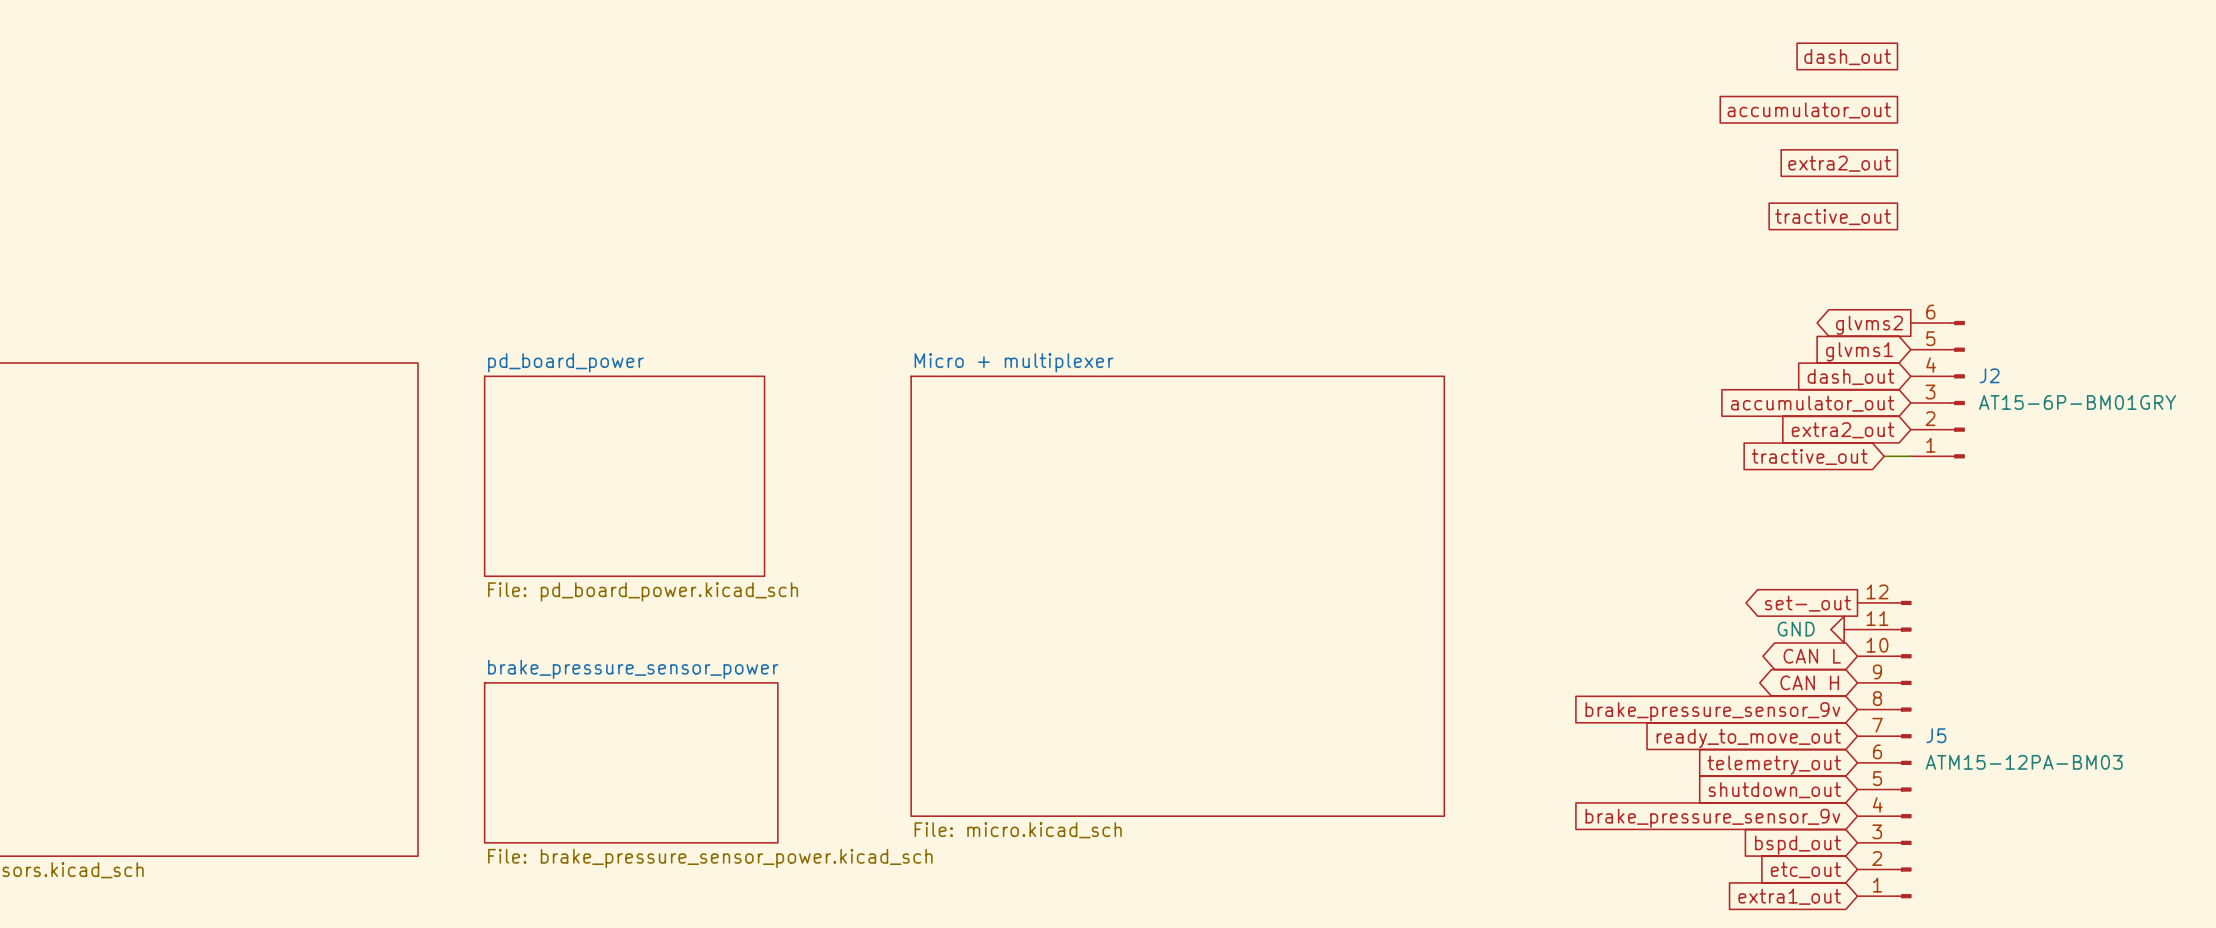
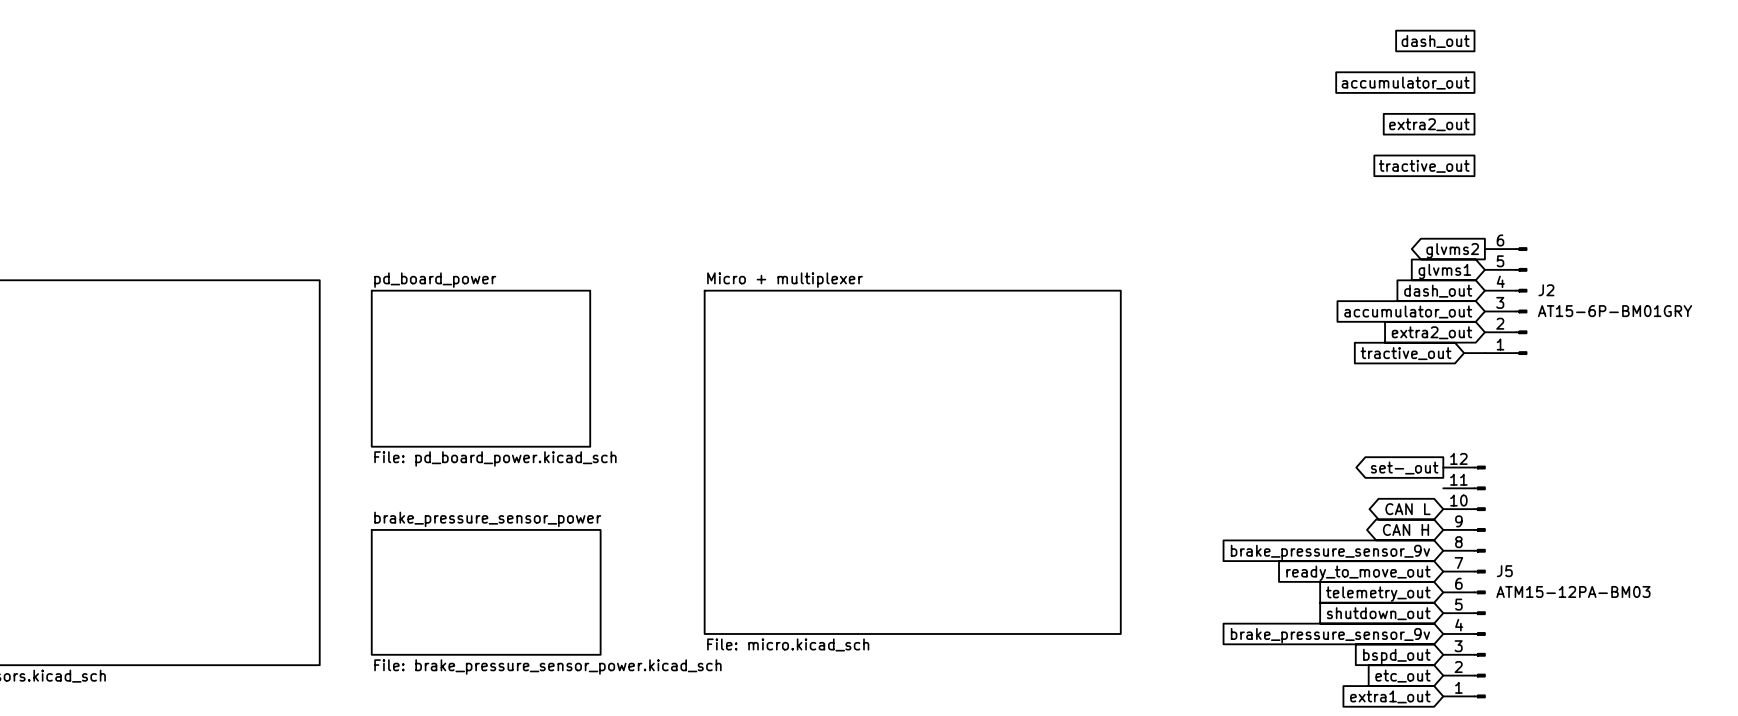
power symbol: GND (1844, 629) -> none

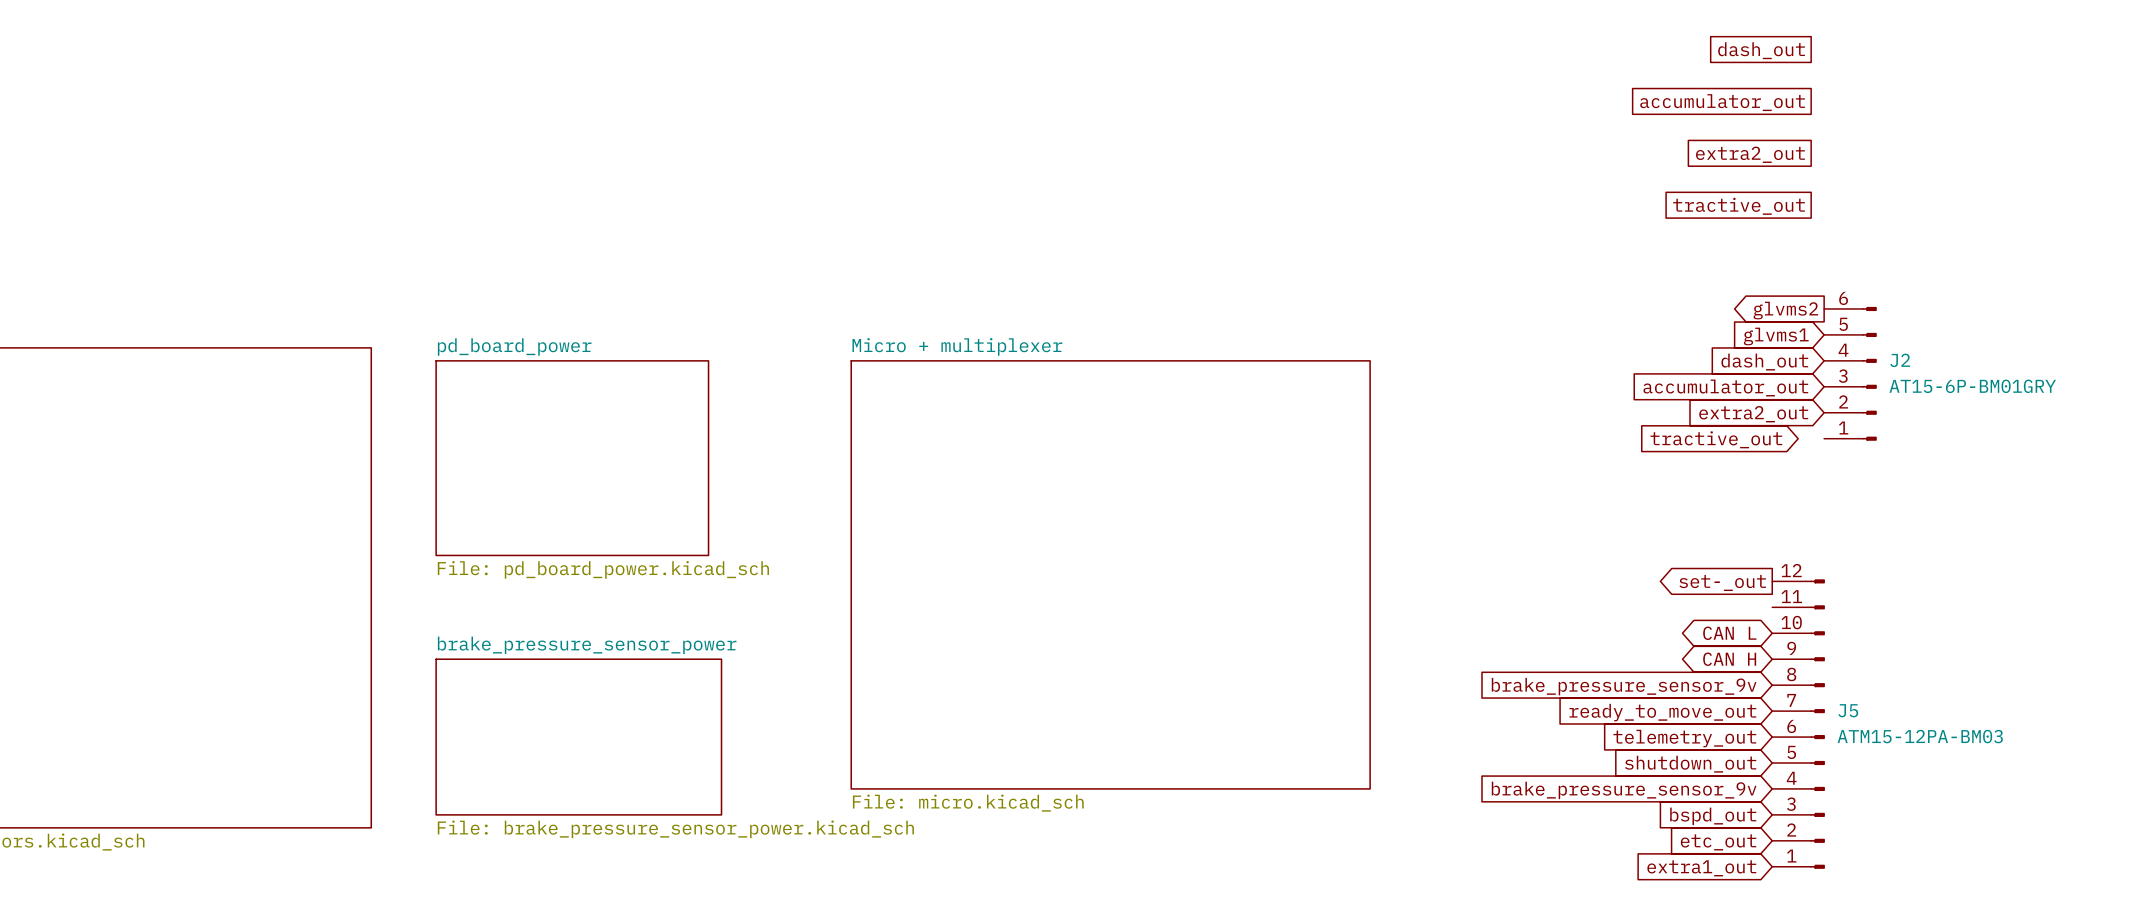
wire: (1464, 353) (1484, 353) -> none

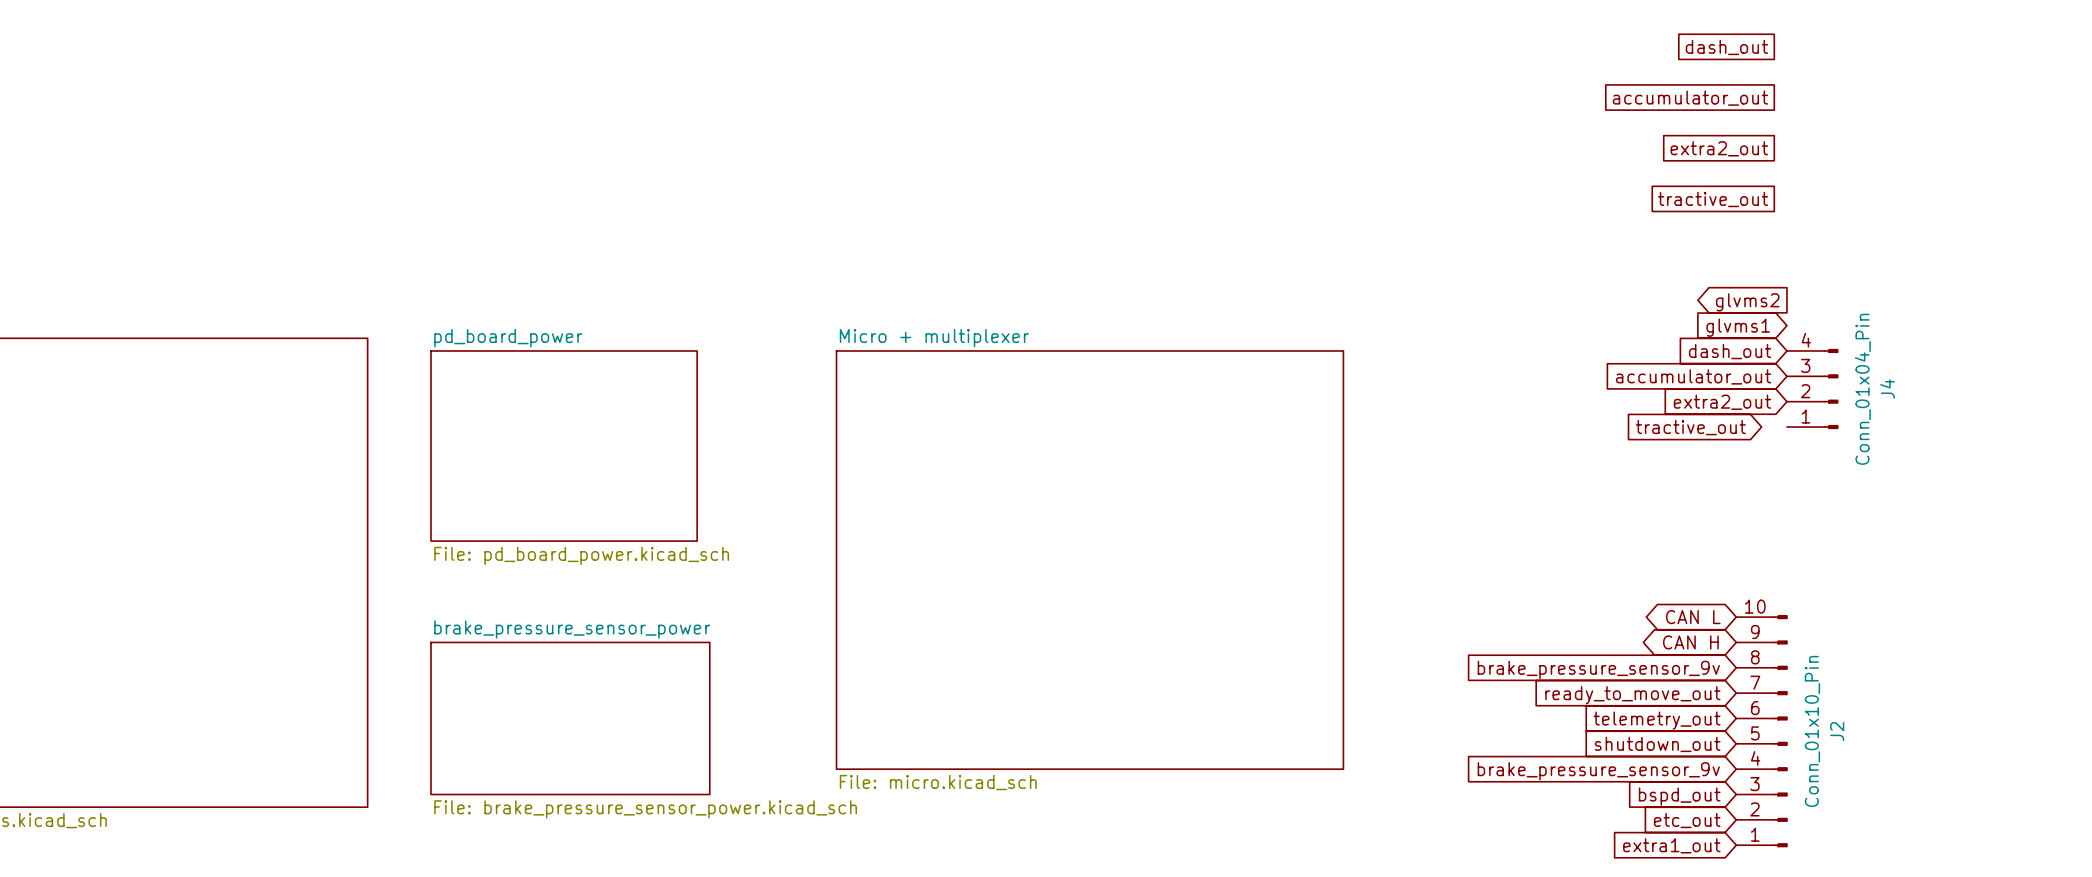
J2 symbol: [1824, 306, 1877, 441] -> [1736, 615, 1788, 848]
J2 name position: J2 (1900, 360) -> J2 (1837, 731)
J2 value: AT15-6P-BM01GRY (1972, 386) -> Conn_01x10_Pin (1812, 731)
J4: none -> Conn_01x04_Pin (1812, 389)
global label: set-_out (1722, 582) -> none
J5: ATM15-12PA-BM03 (1798, 724) -> none

